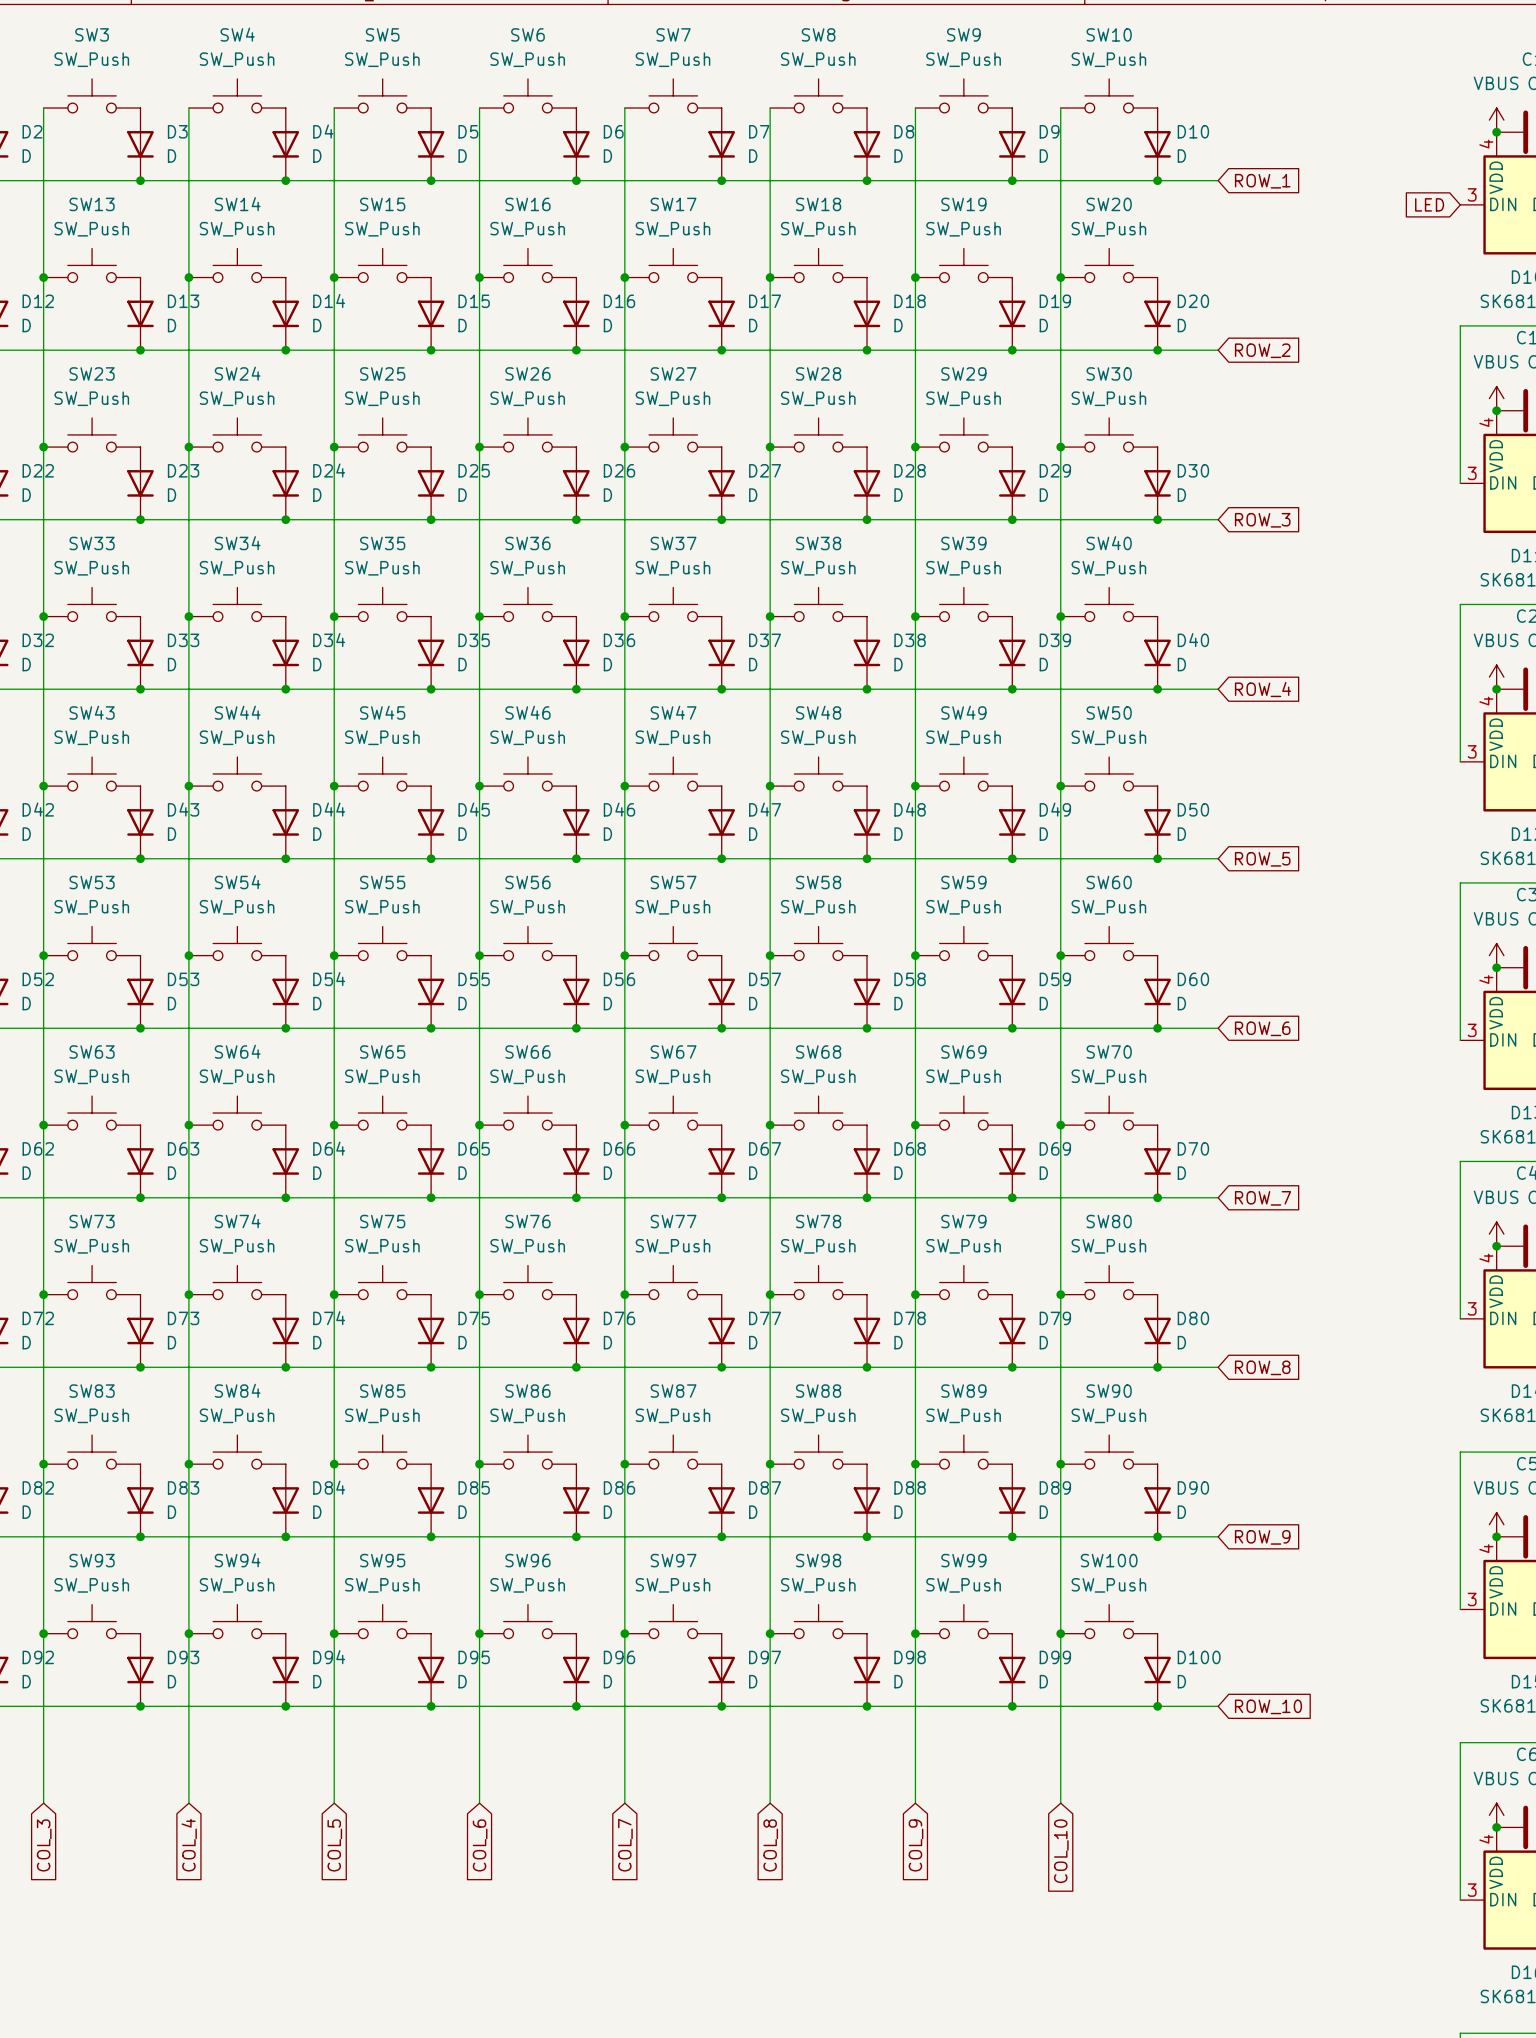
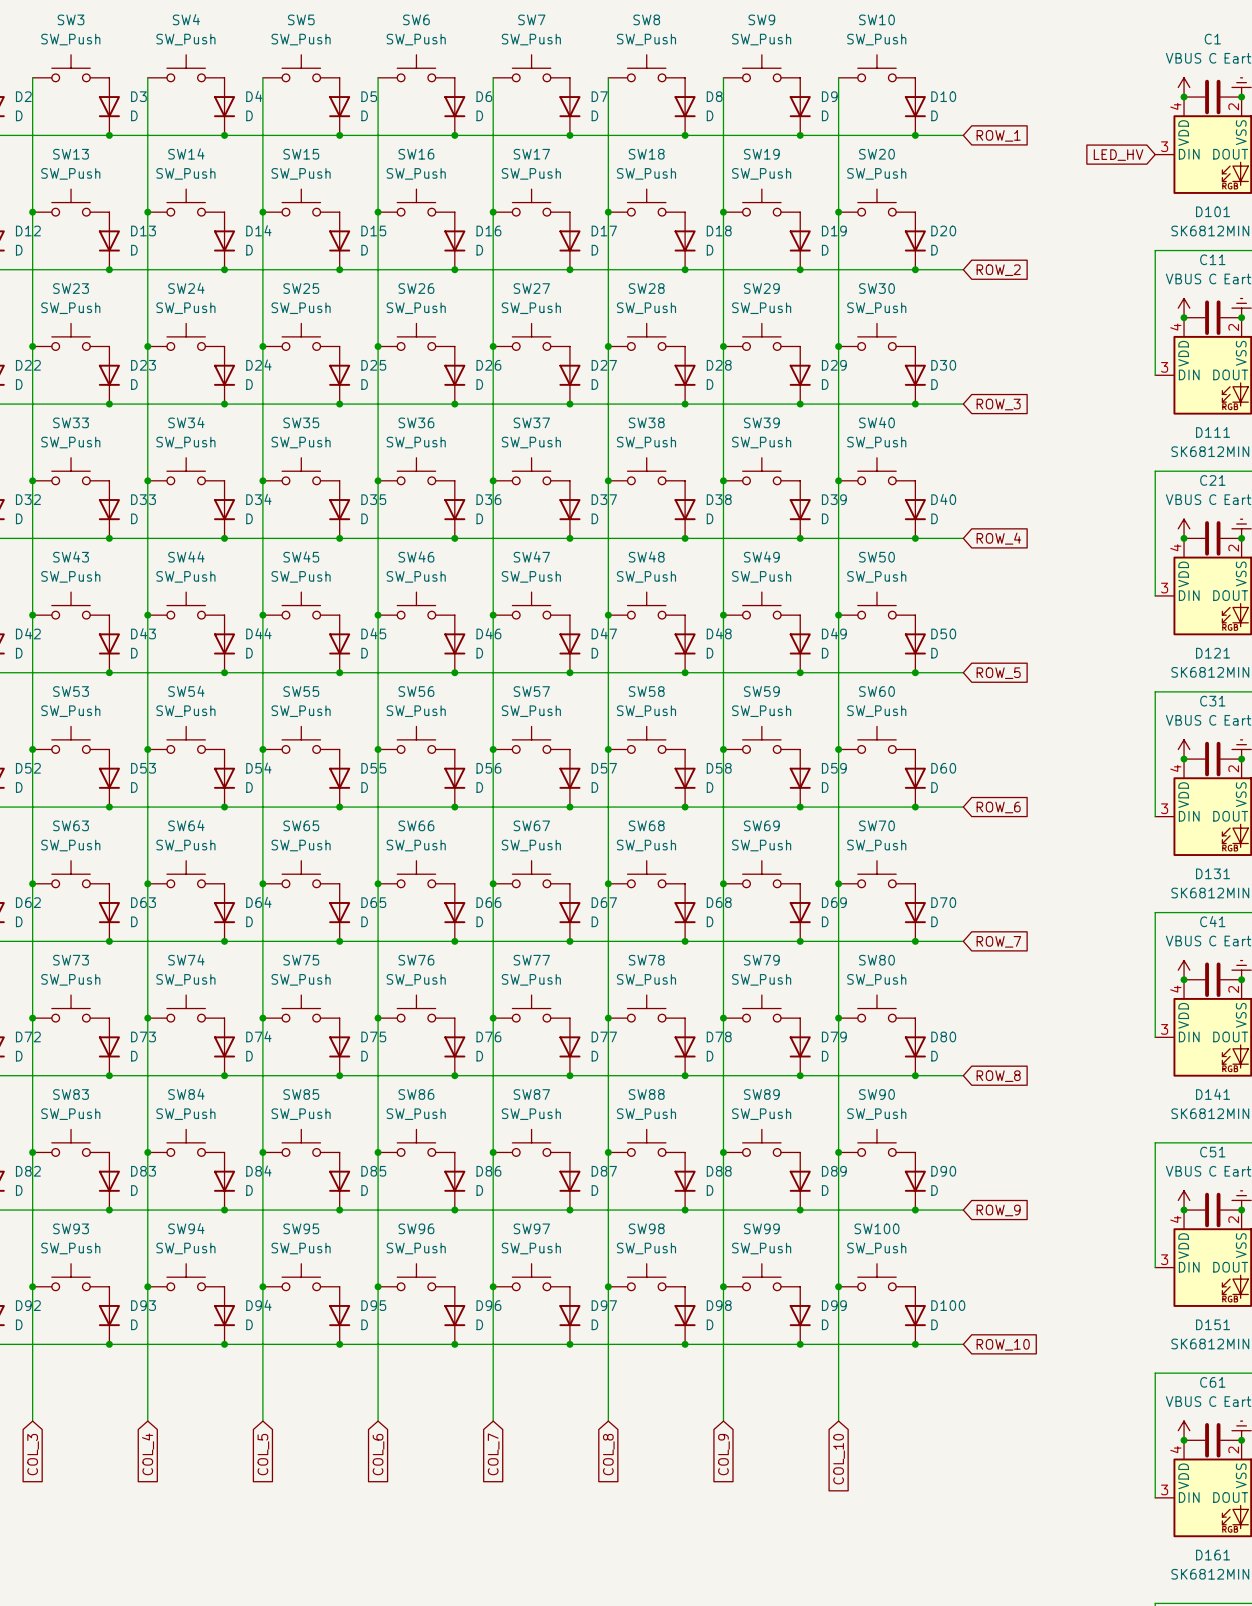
global label: LED (1429, 204) -> LED_HV (1118, 155)

